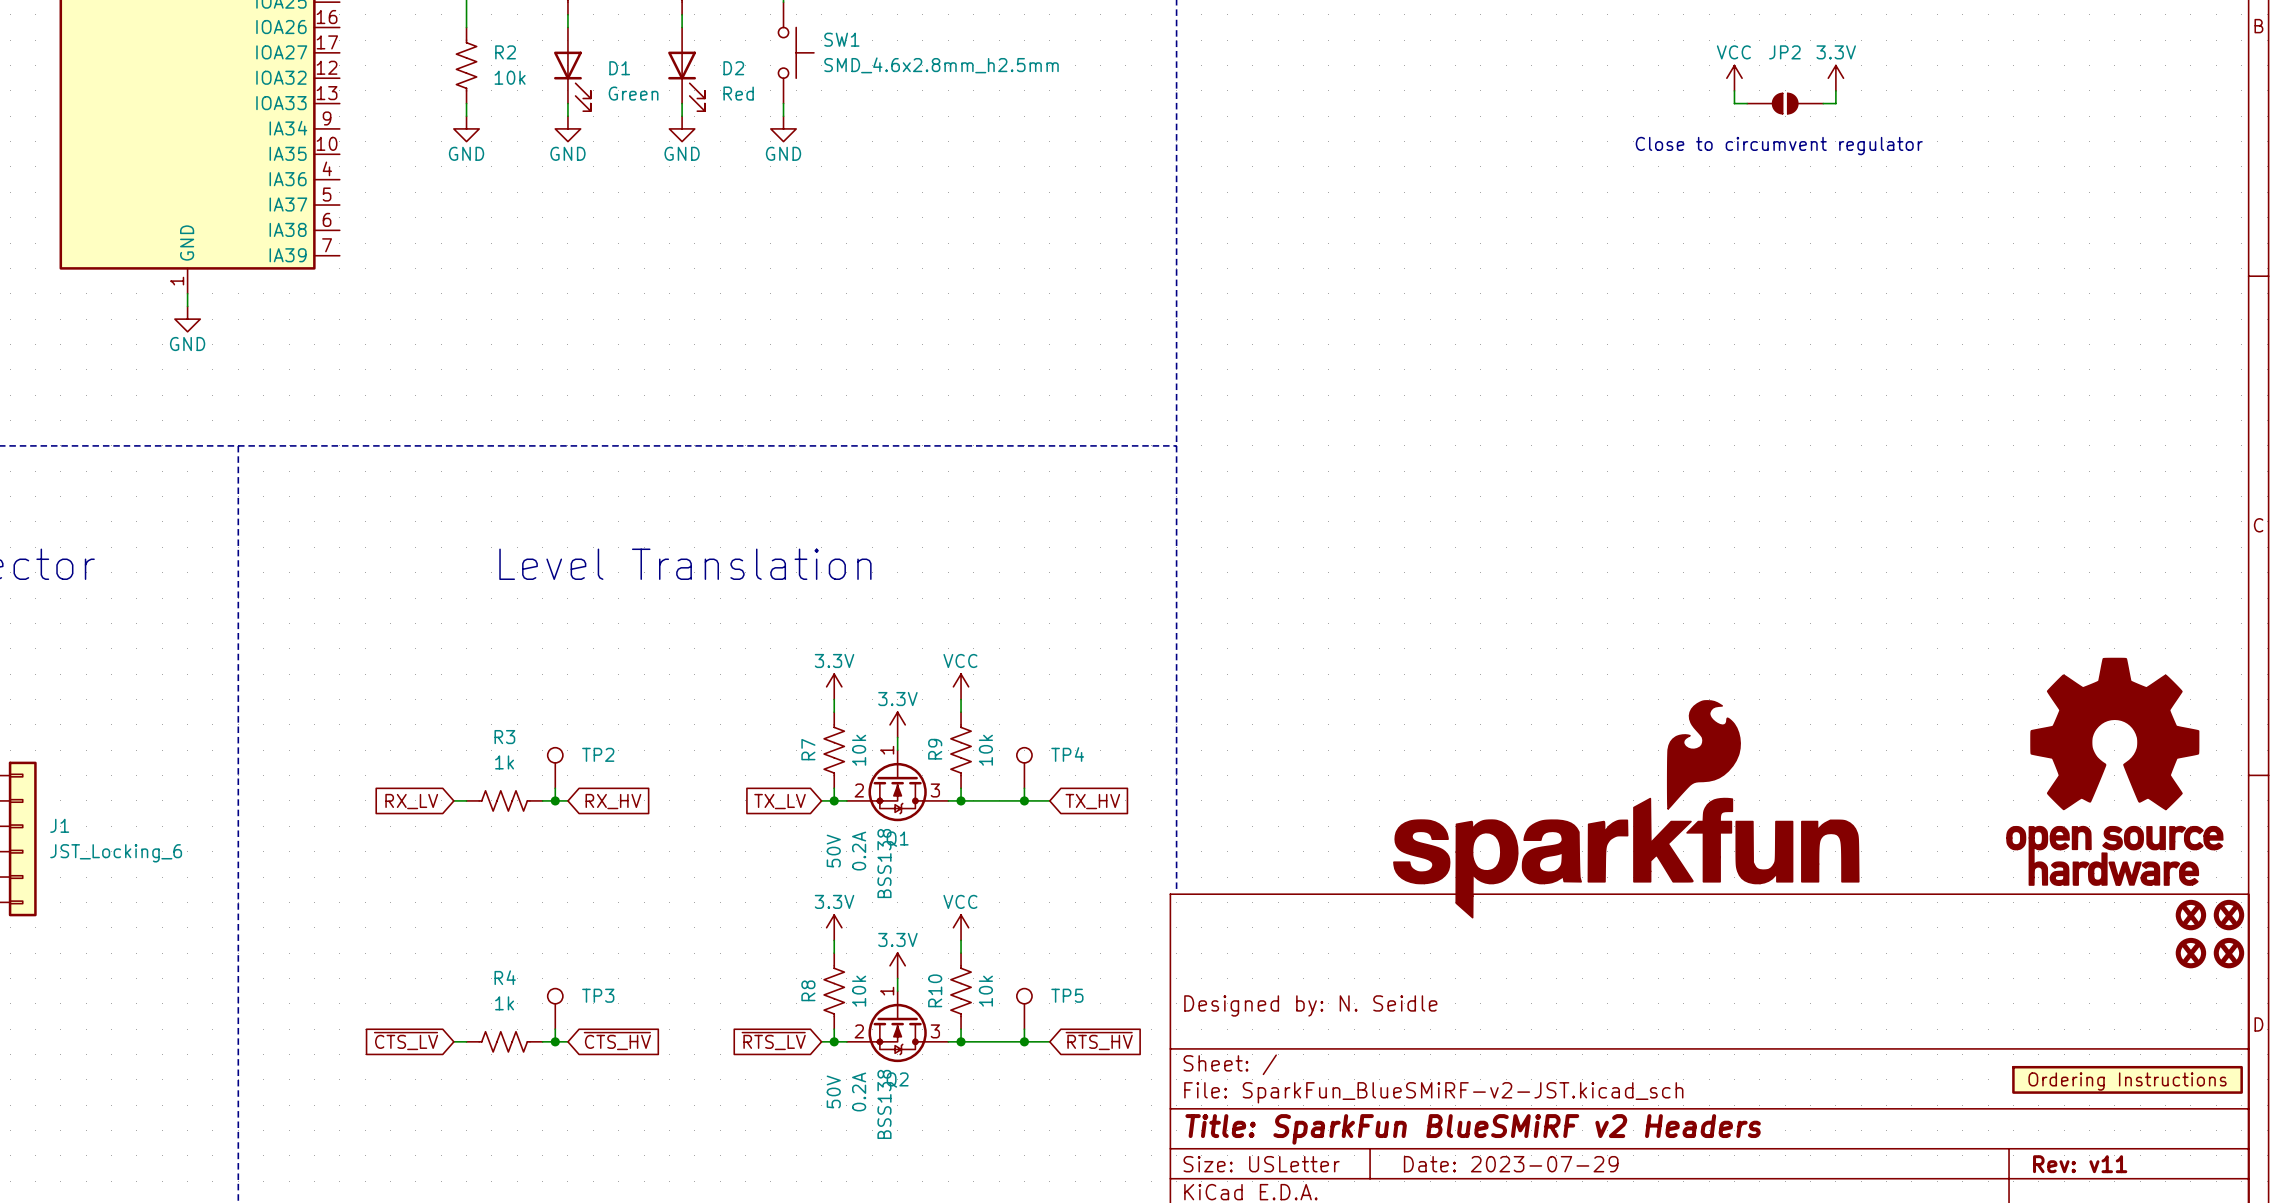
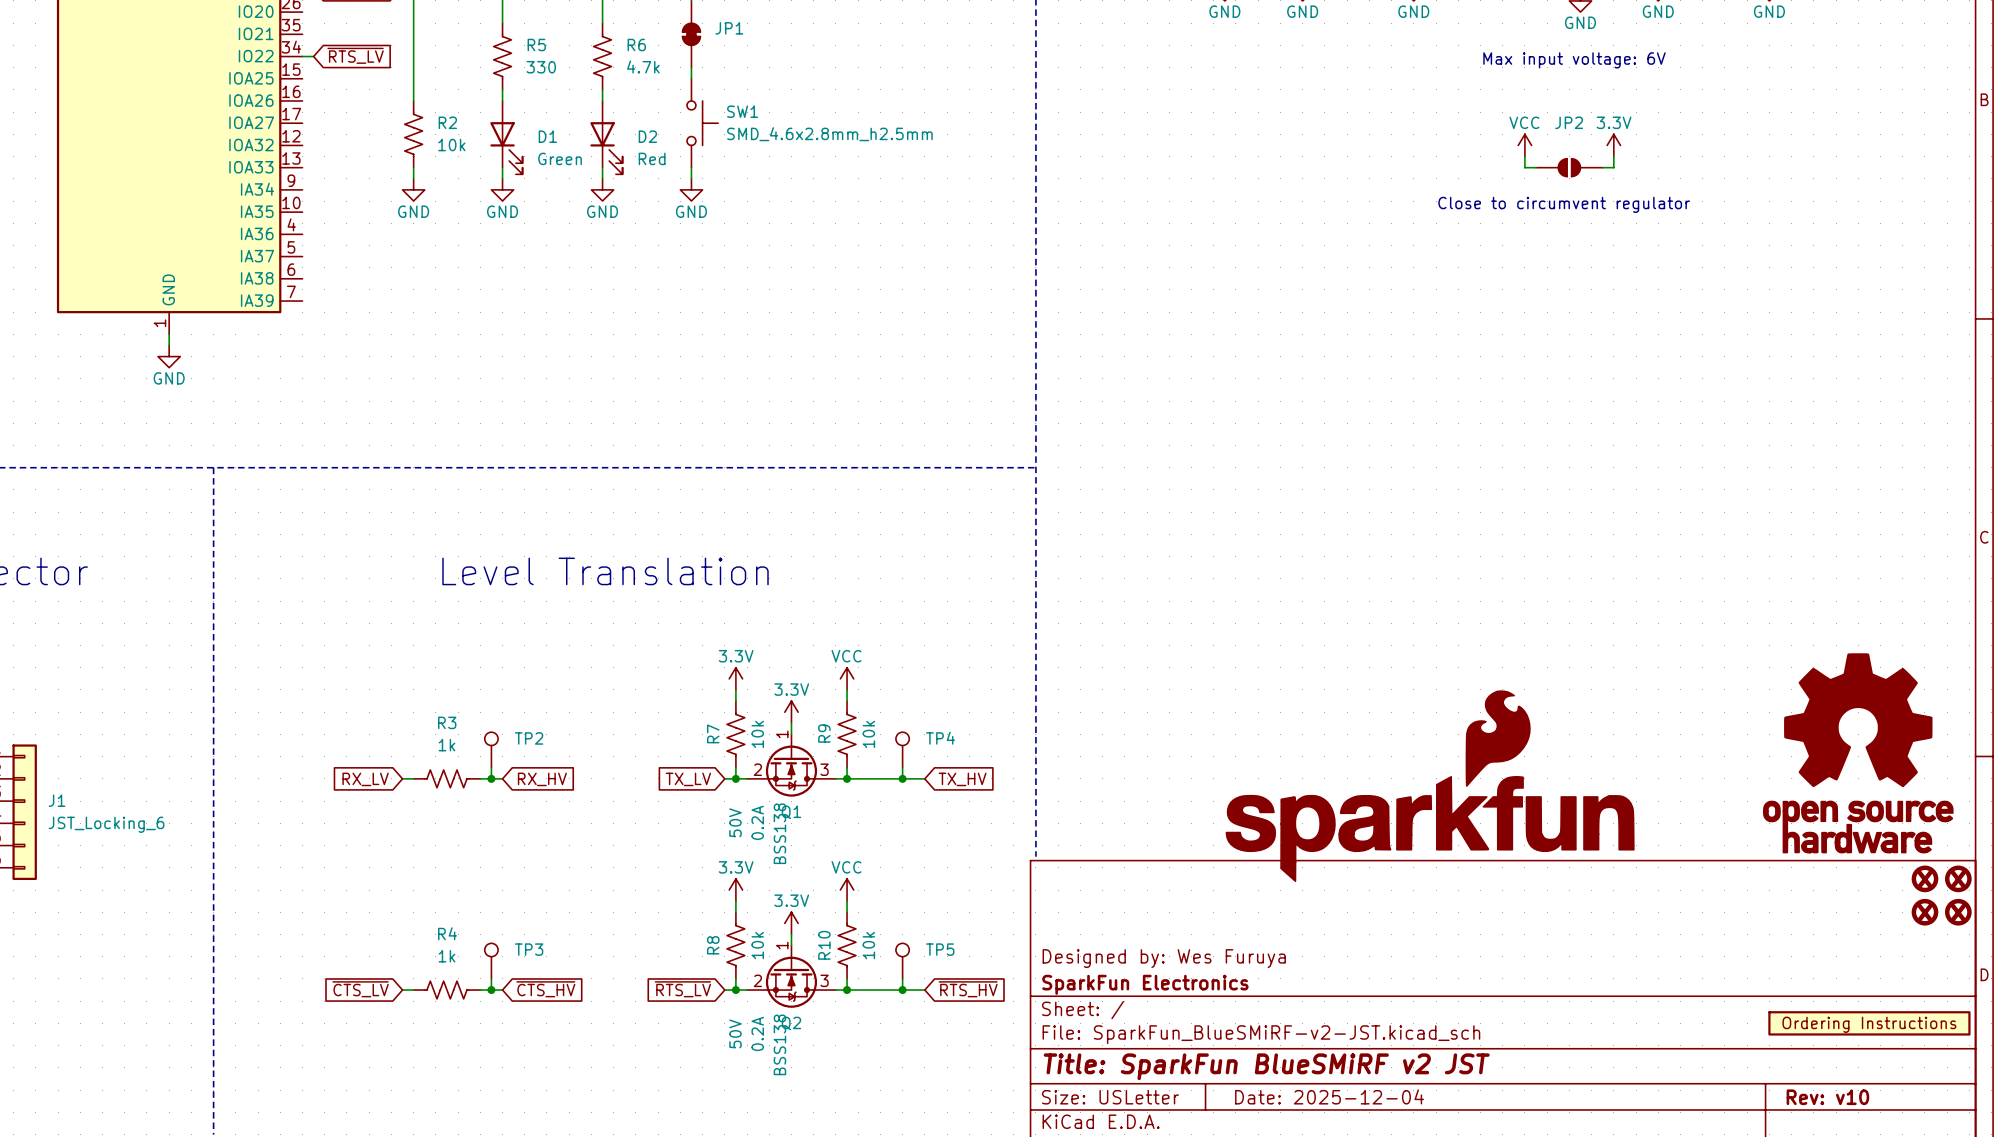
title block: Designed by: N. Seidle (1310, 1005) -> Designed by: Wes Furuya (1164, 958)
title block: none -> SparkFun Electronics (1145, 984)
title block: Title: SparkFun BlueSMiRF v2 Headers (1473, 1129) -> Title: SparkFun BlueSMiRF v2 JST (1266, 1066)
title block: Date: 2023-07-29 (1511, 1164) -> Date: 2025-12-04 (1329, 1096)
title block: Rev: v11 (2080, 1164) -> Rev: v10 (1827, 1097)

